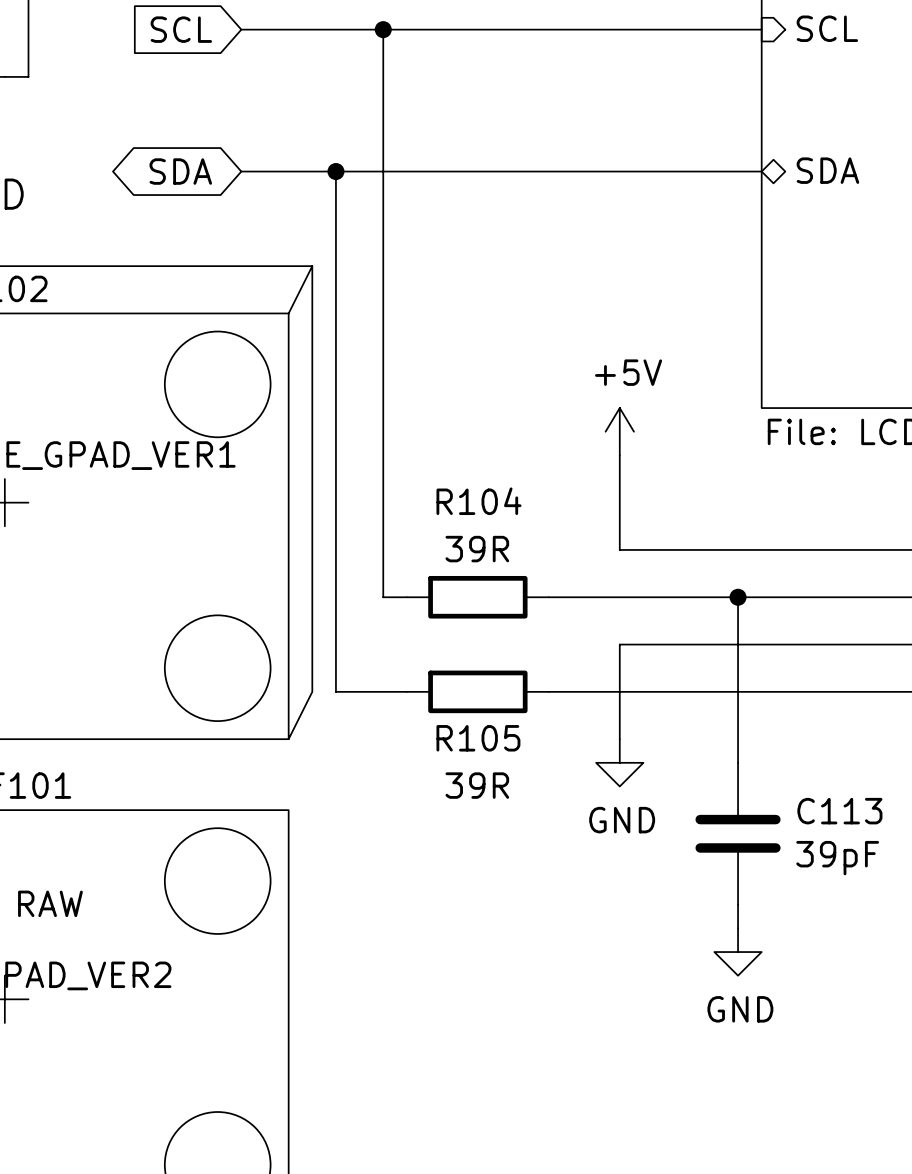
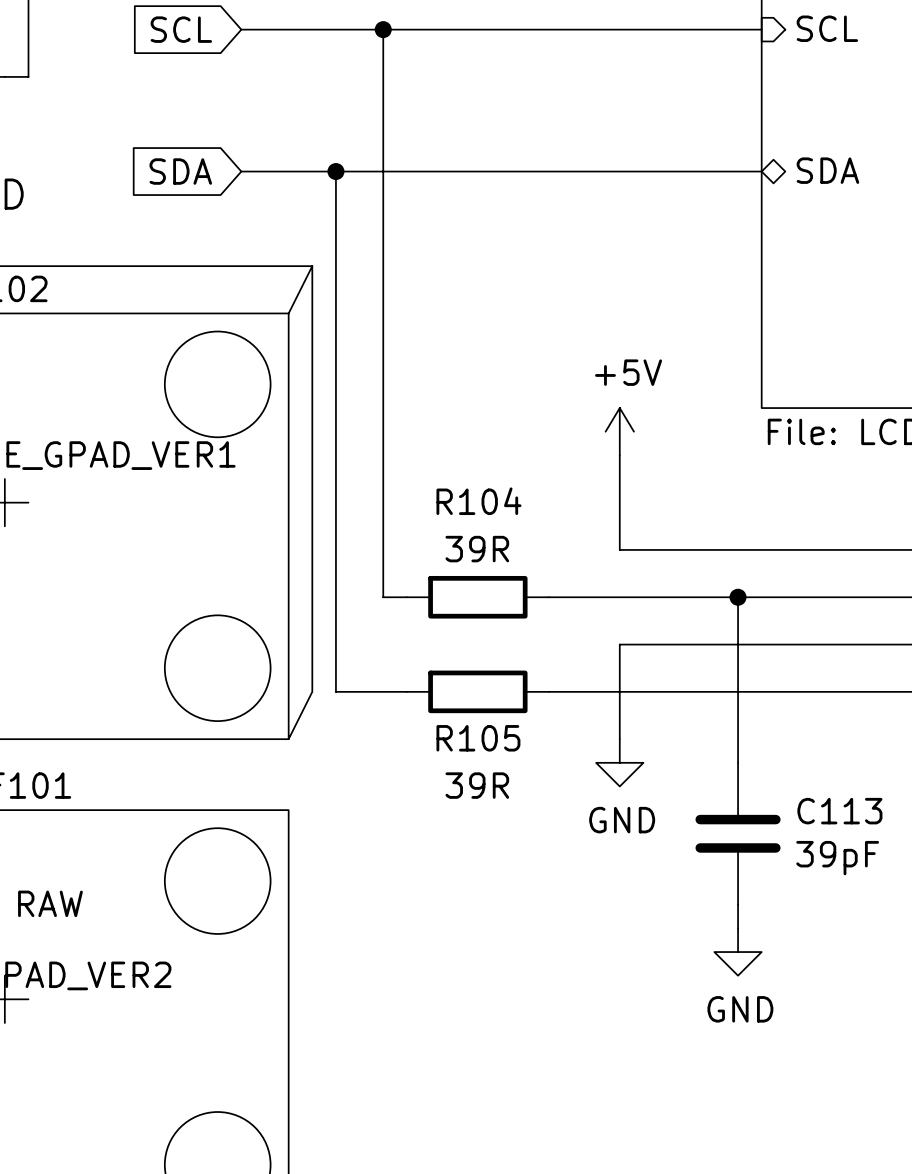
global label shape: bidirectional (180, 171) -> input (180, 171)

